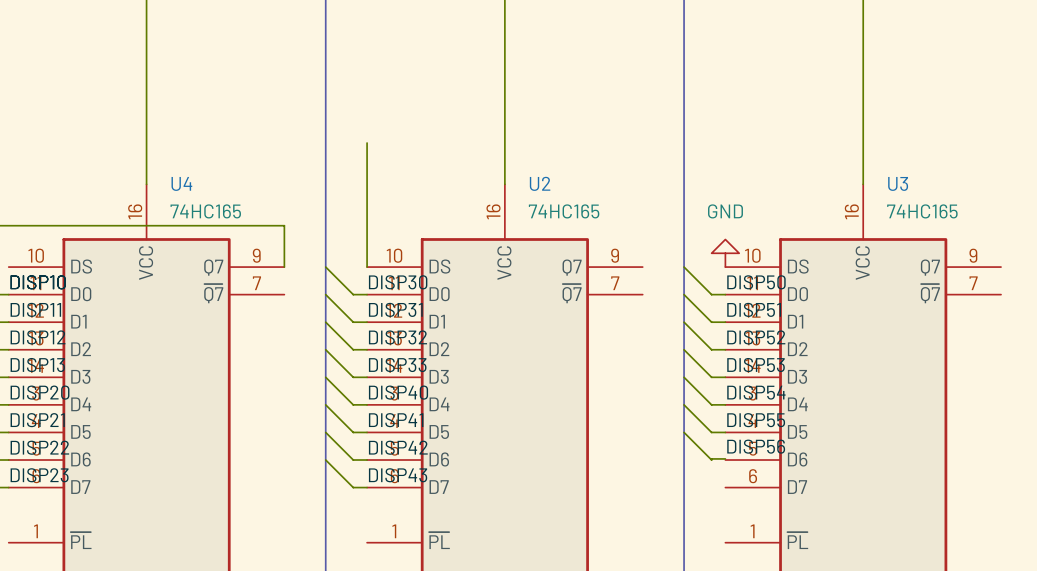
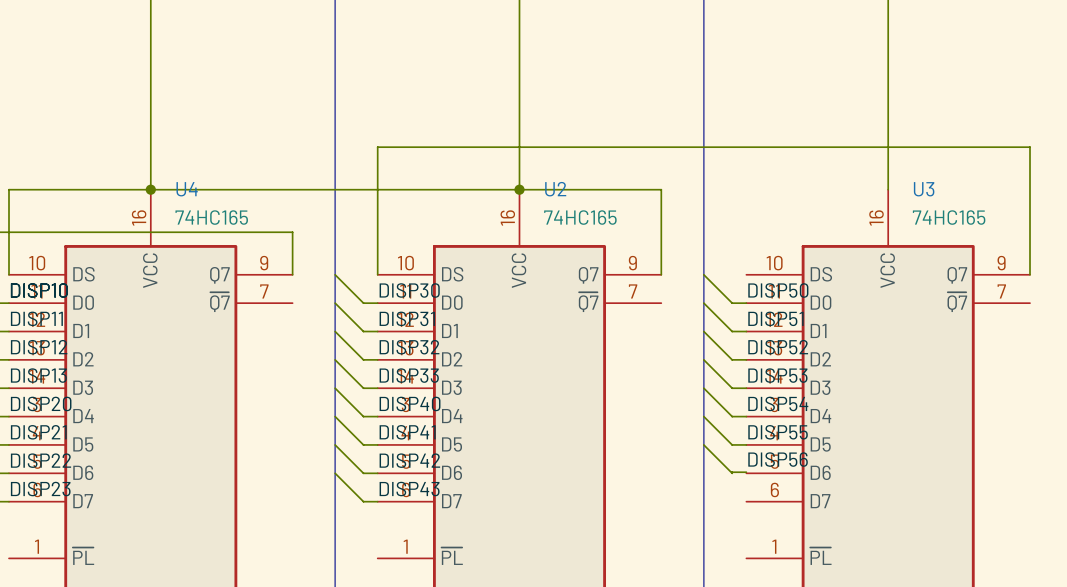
wire: none -> (377, 147) (1030, 147) (1030, 274)
junction: none -> (150, 189)
junction: none -> (519, 189)
power symbol: GND (725, 253) -> none
wire: none -> (8, 274) (8, 189) (661, 189) (661, 274)

